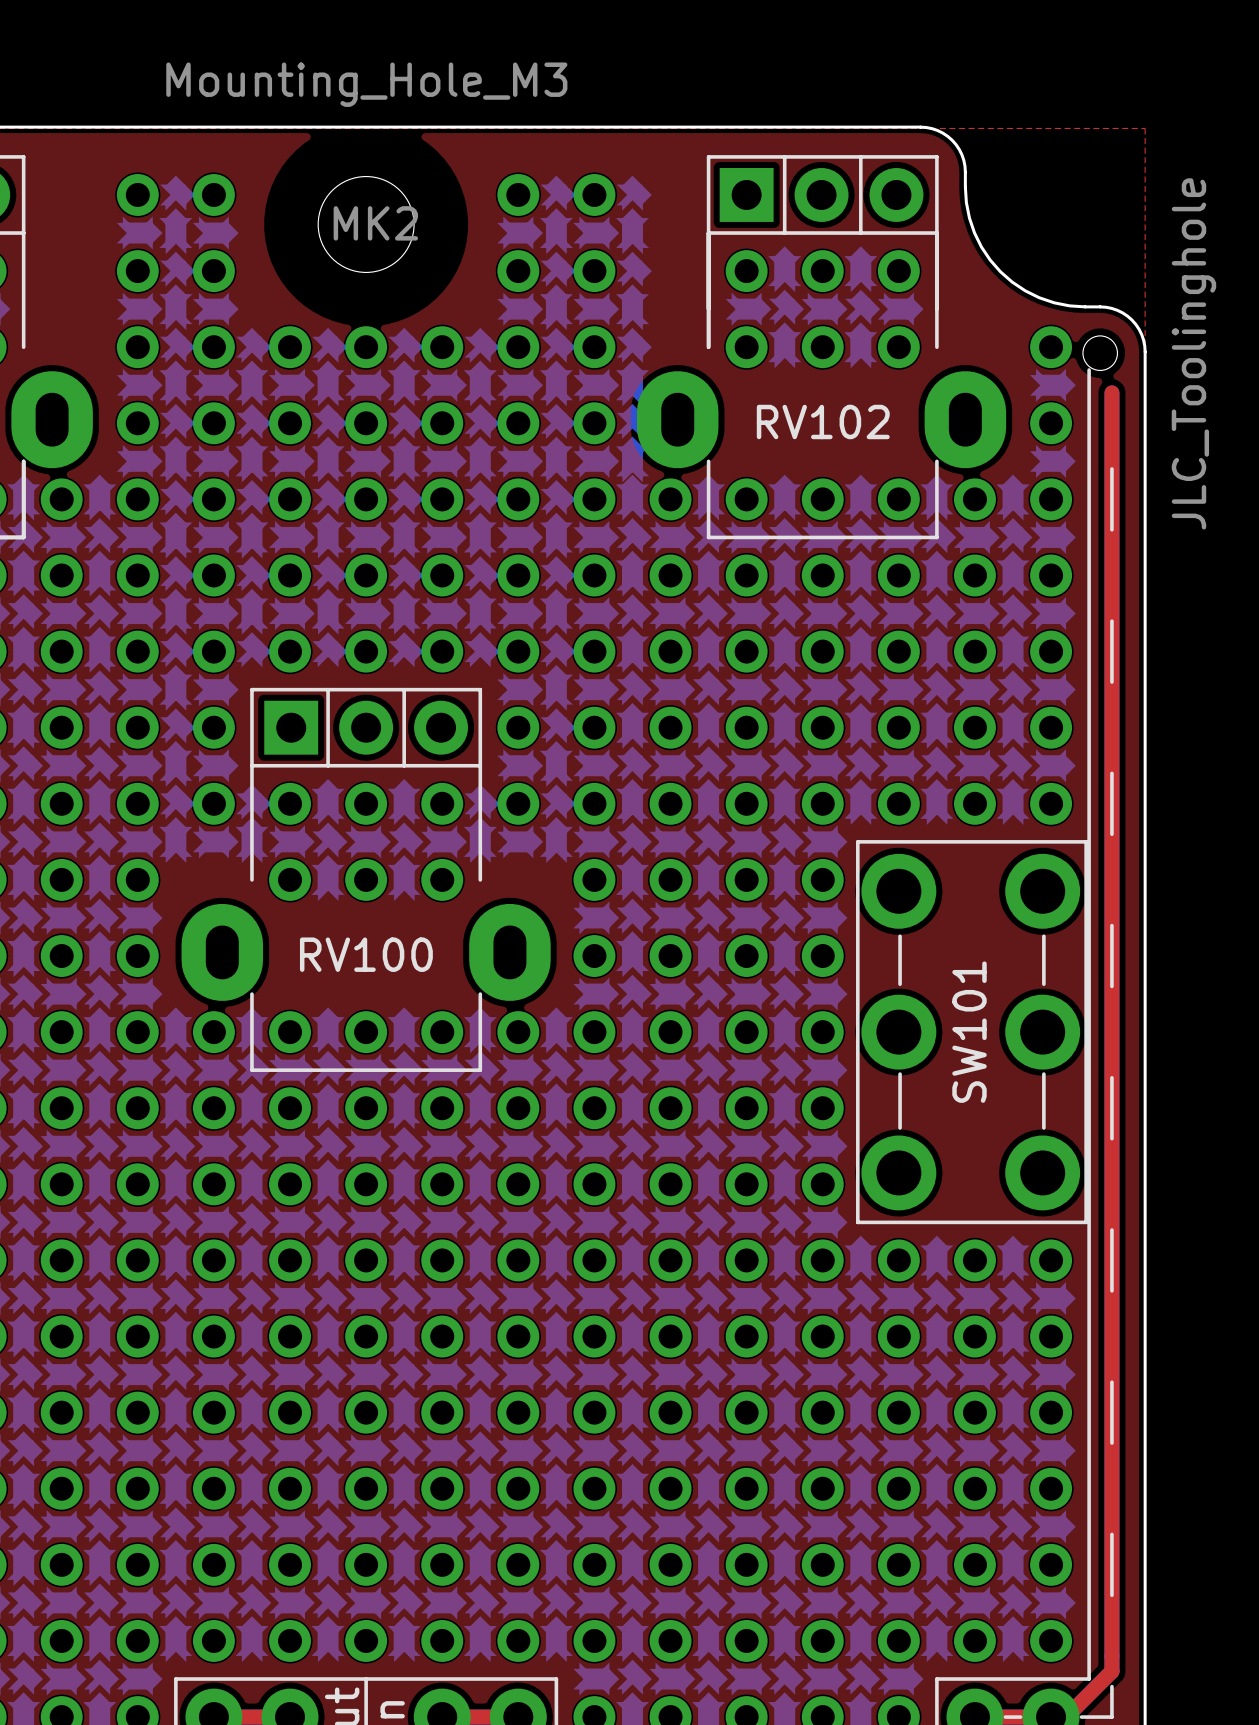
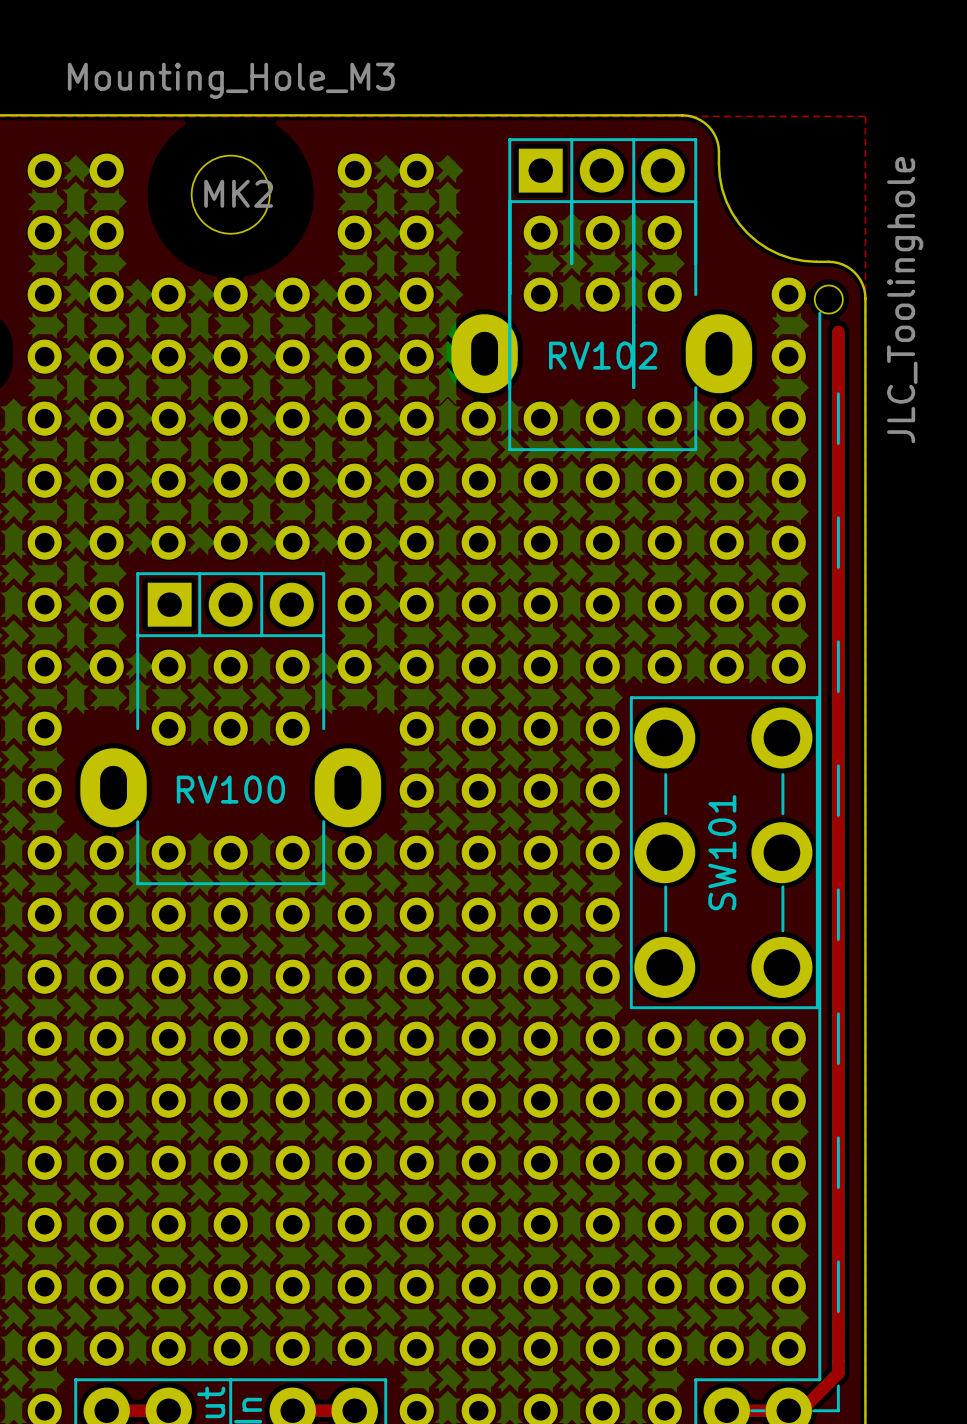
line: none -> (571, 201) (571, 263)
line: none -> (633, 201) (633, 387)
line: none -> (509, 294) (509, 387)

